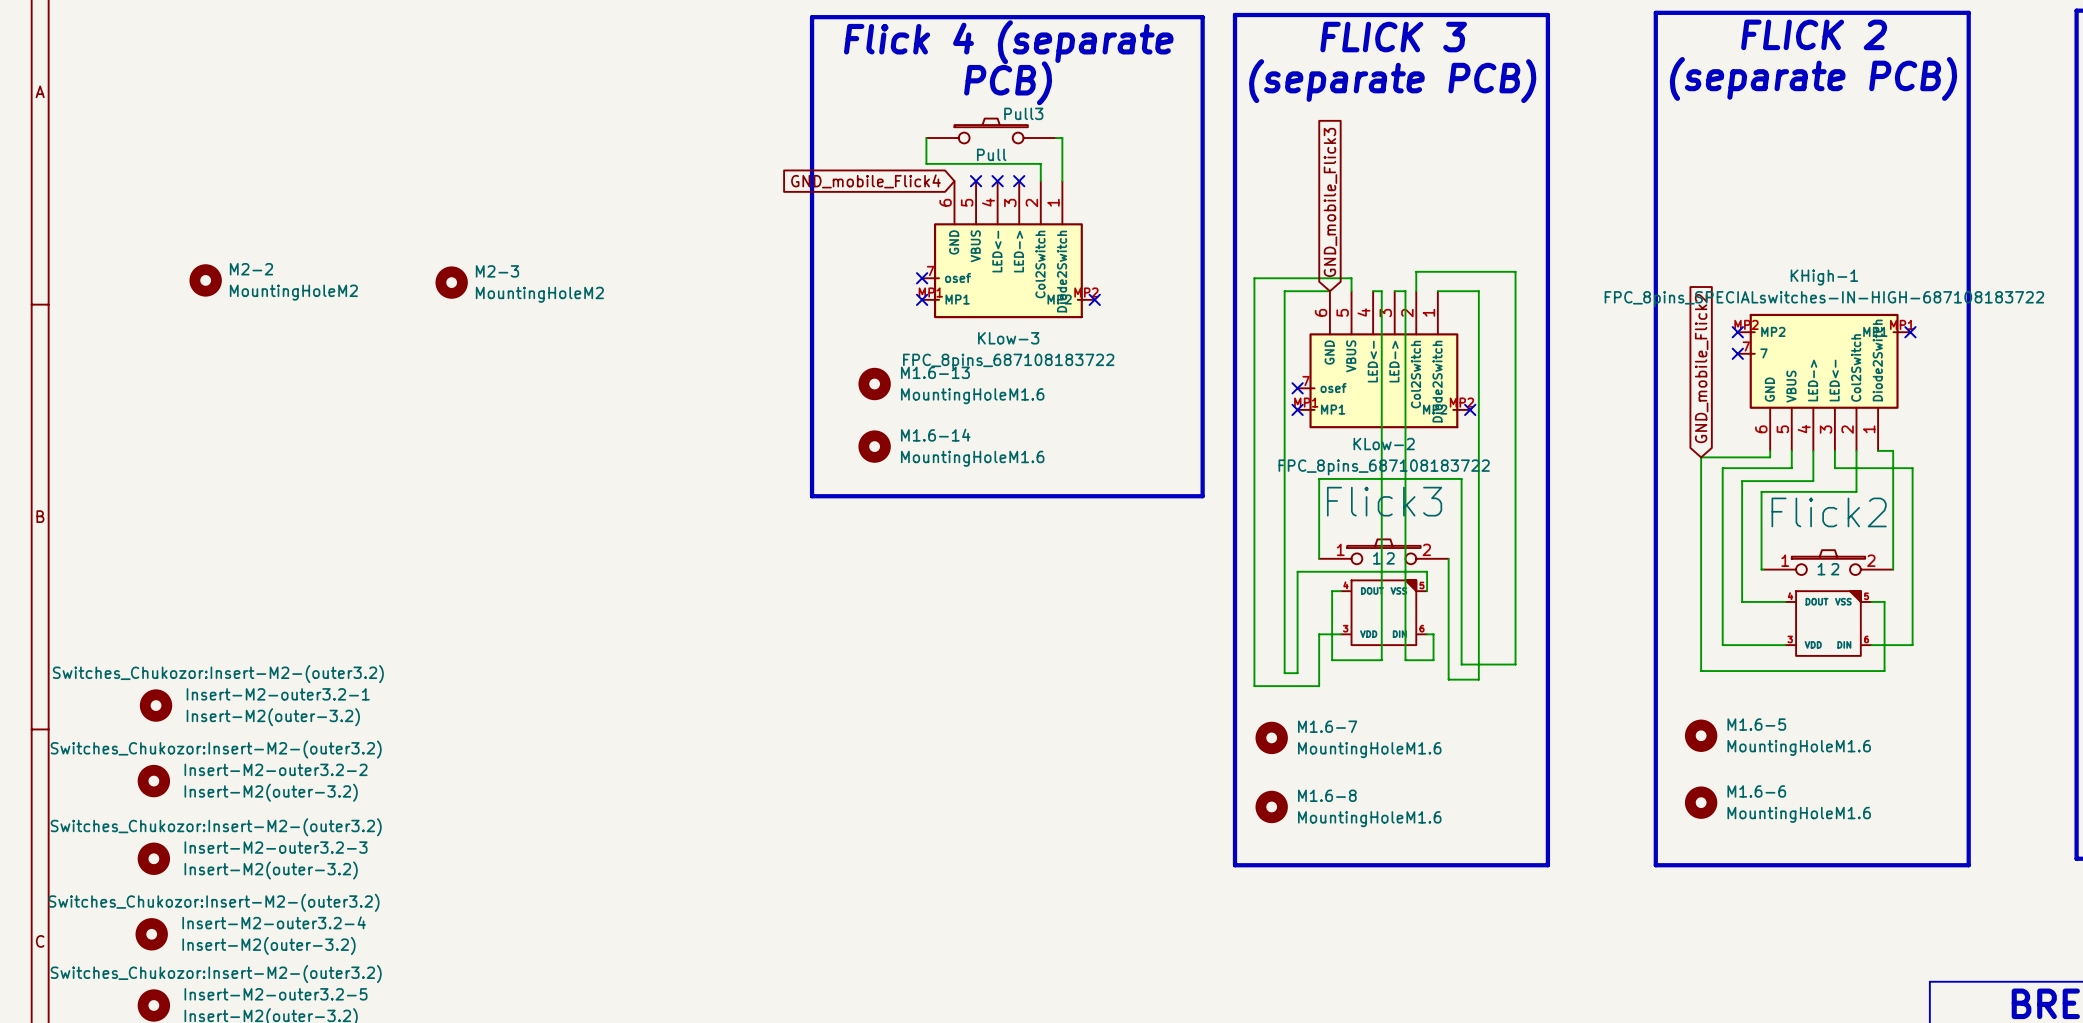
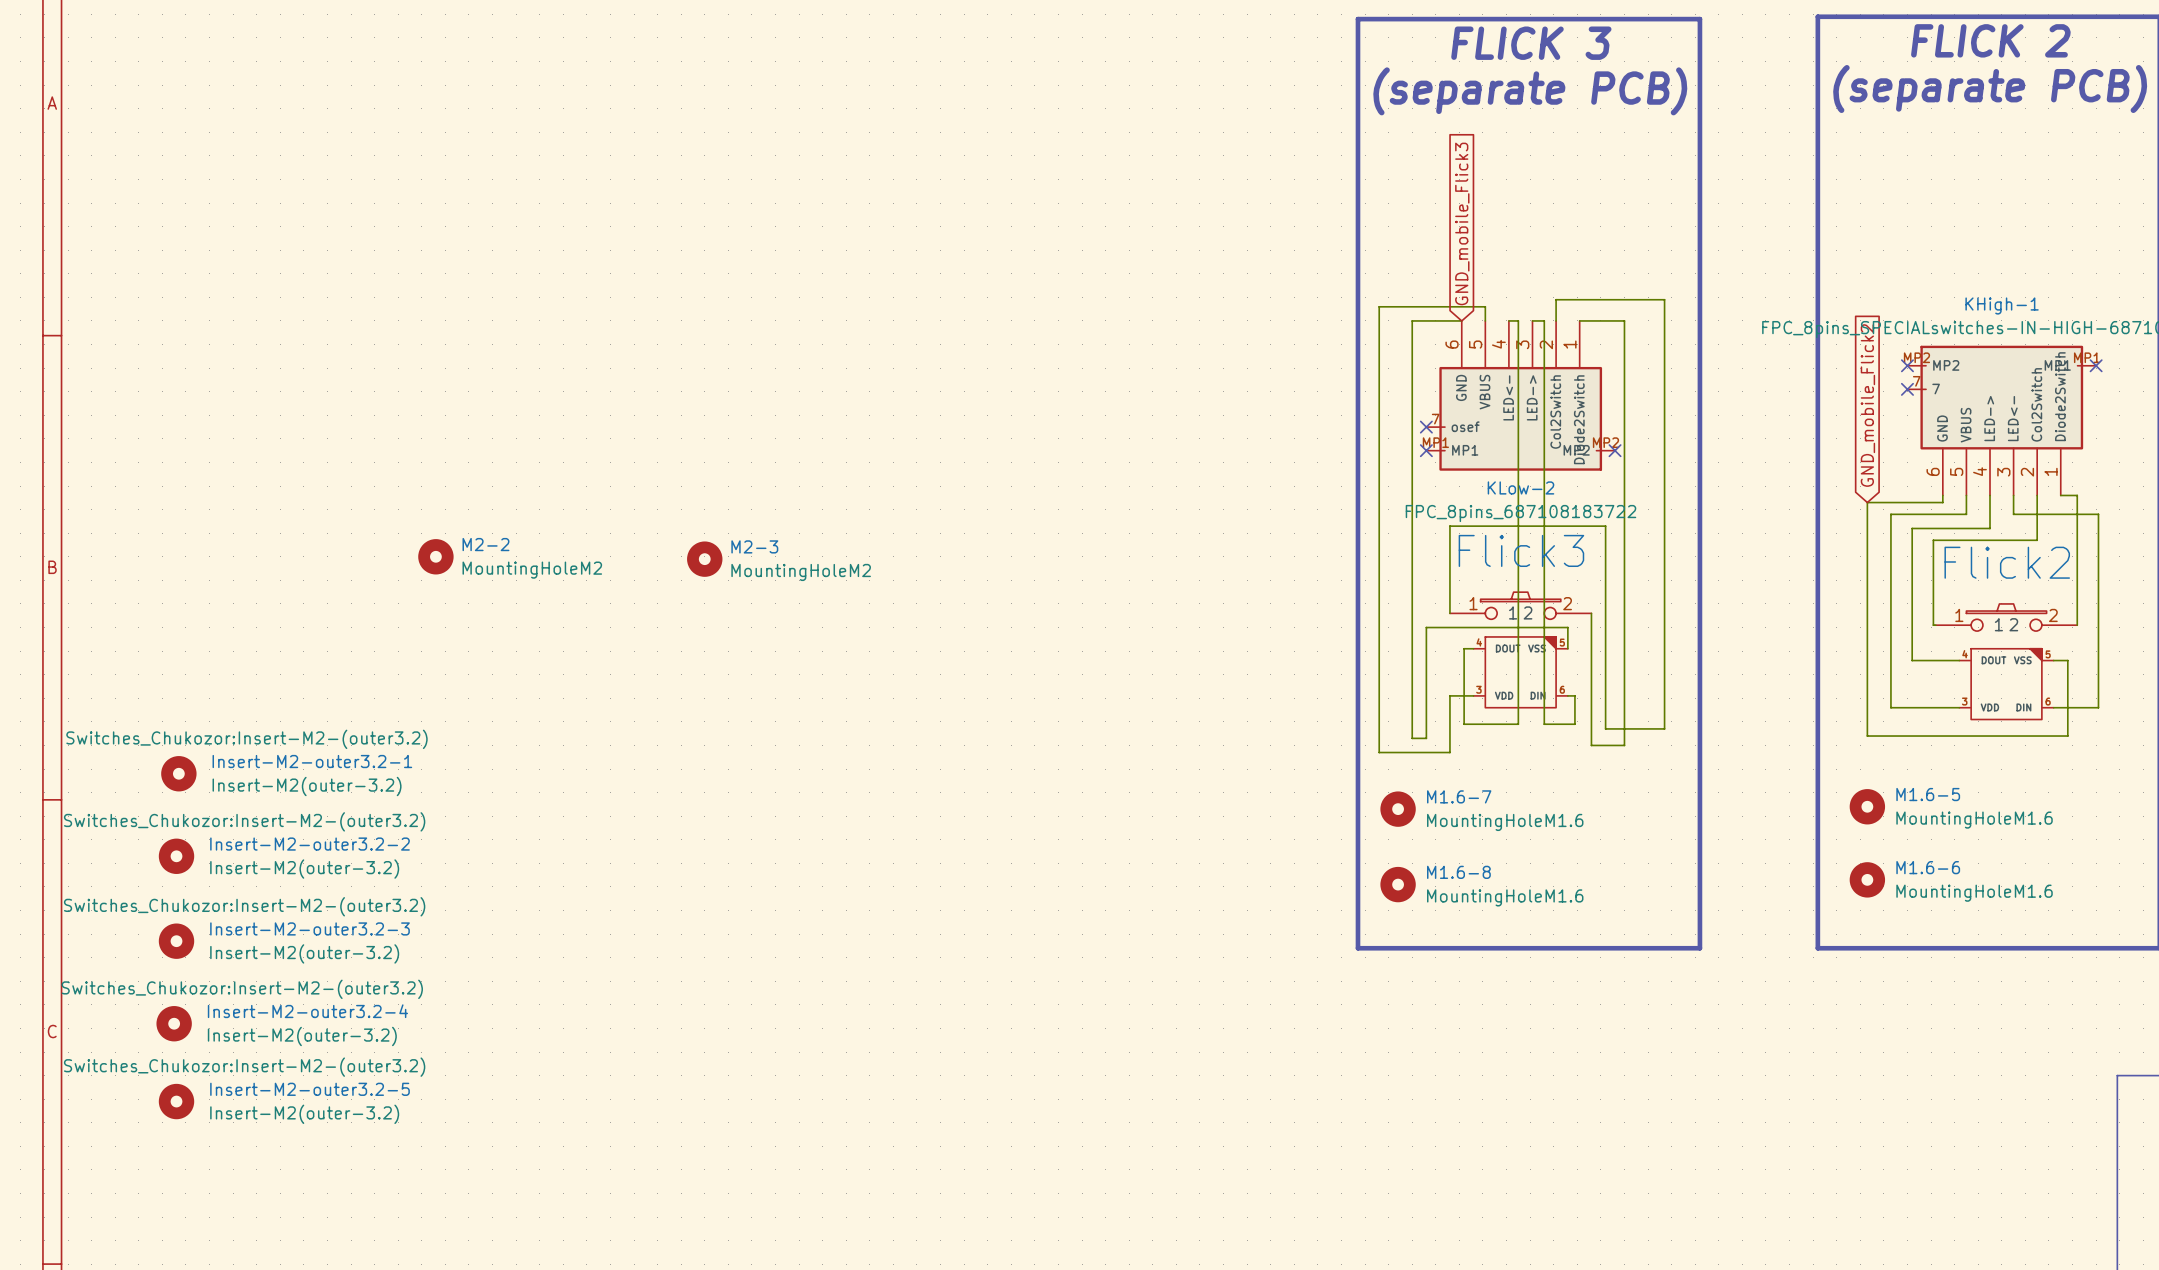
line: (812, 17) (1202, 17) (1202, 496) (812, 496) (812, 17) -> none
text: Flick 4 (separate (1008, 42) -> none
text: PCB) (1008, 83) -> none
Pull3: Pull (991, 130) -> none
wire: (926, 138) (926, 163) (1040, 163) (1040, 181) -> none
wire: (1055, 138) (1062, 138) (1062, 181) -> none
global label: GND_mobile_Flick4 (865, 181) -> none
no-connect mark: (976, 181) -> none
no-connect mark: (997, 181) -> none
no-connect mark: (1019, 181) -> none
KLow-3: FPC_8pins_687108183722 (1008, 249) -> none
no-connect mark: (922, 278) -> none
M2-2 position: (205, 280) -> (435, 556)
M2-3 position: (451, 282) -> (704, 559)
no-connect mark: (922, 299) -> none
no-connect mark: (1094, 299) -> none
M1.6-13: MountingHoleM1.6 (874, 384) -> none
M1.6-14: MountingHoleM1.6 (874, 446) -> none

